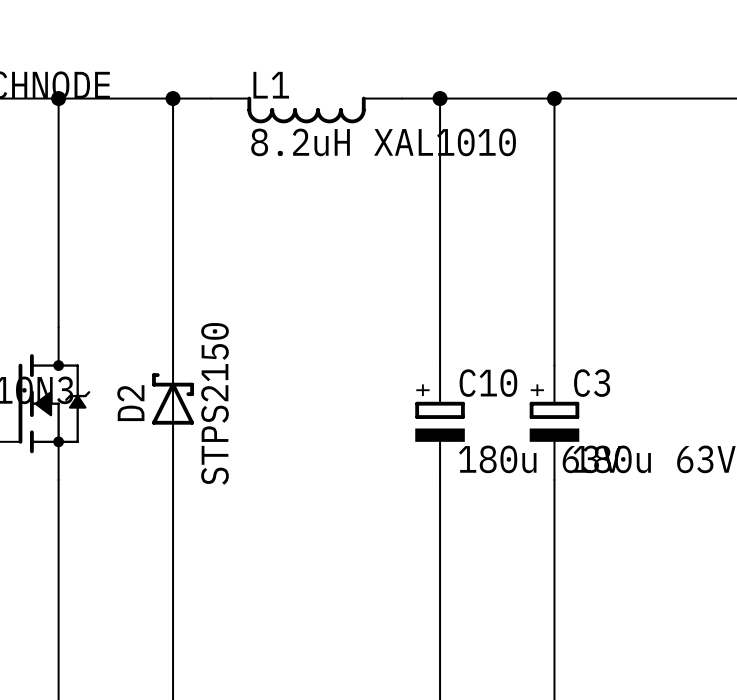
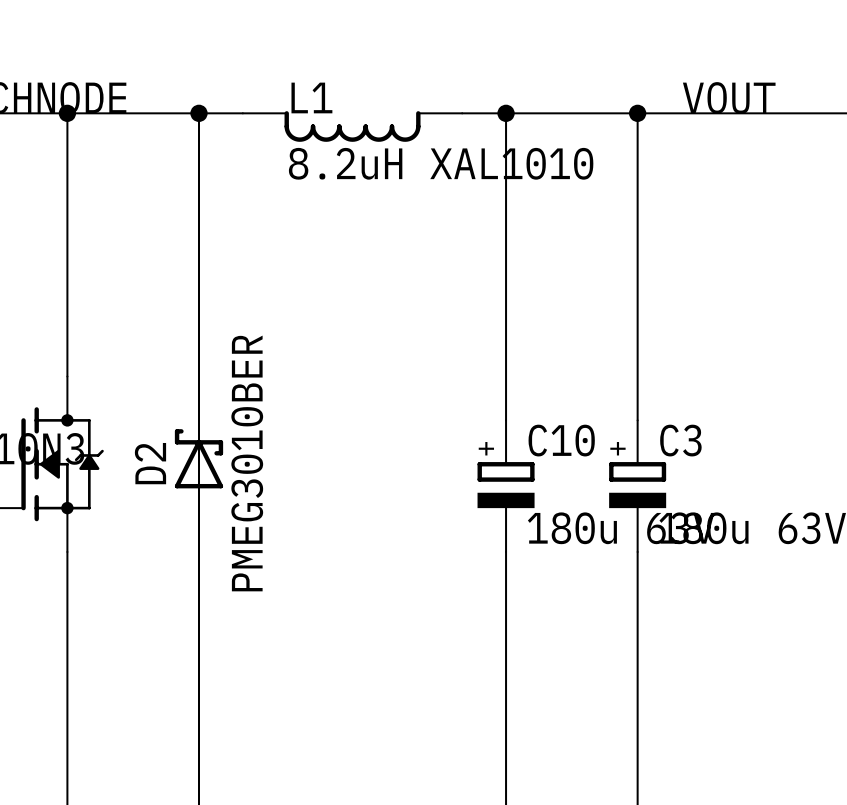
label: none -> VOUT (729, 97)
D2 value: STPS2150 (215, 403) -> PMEG3010BER (247, 463)

